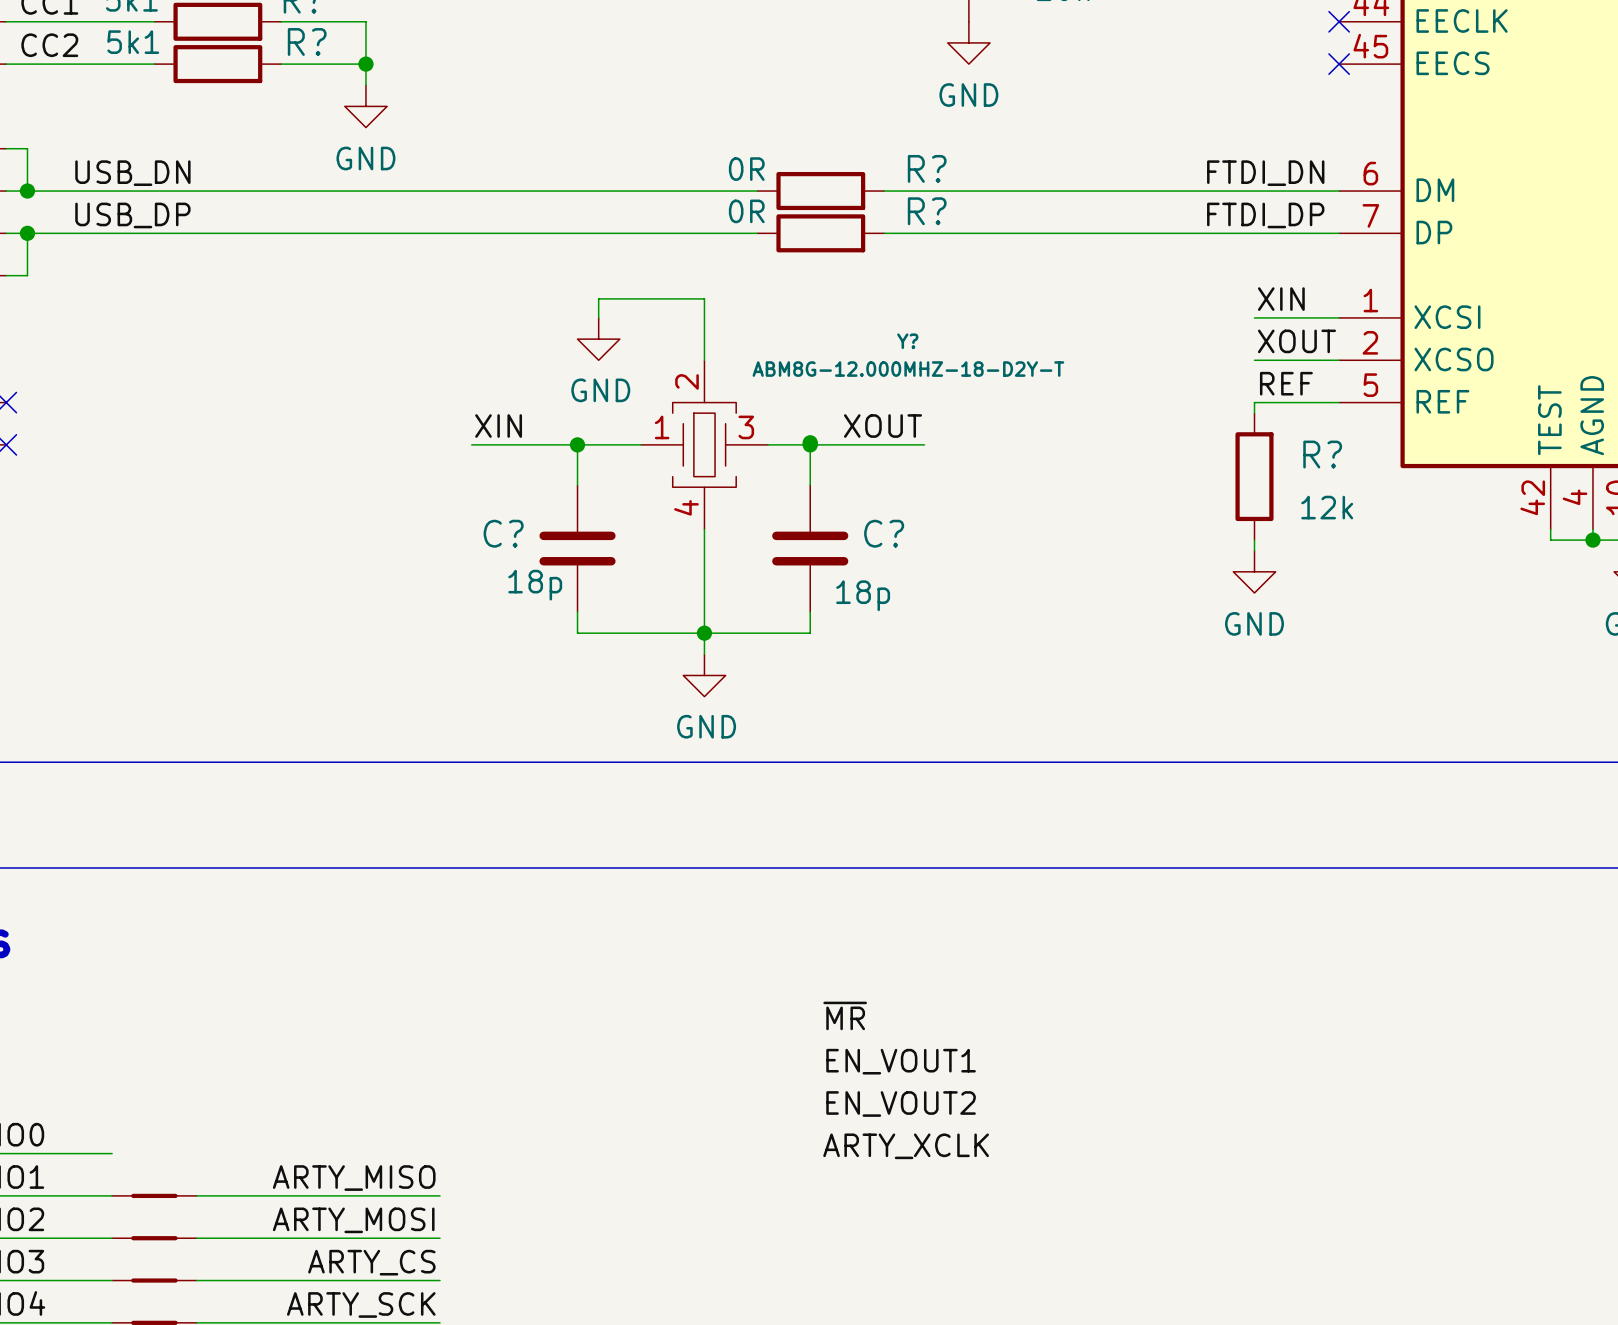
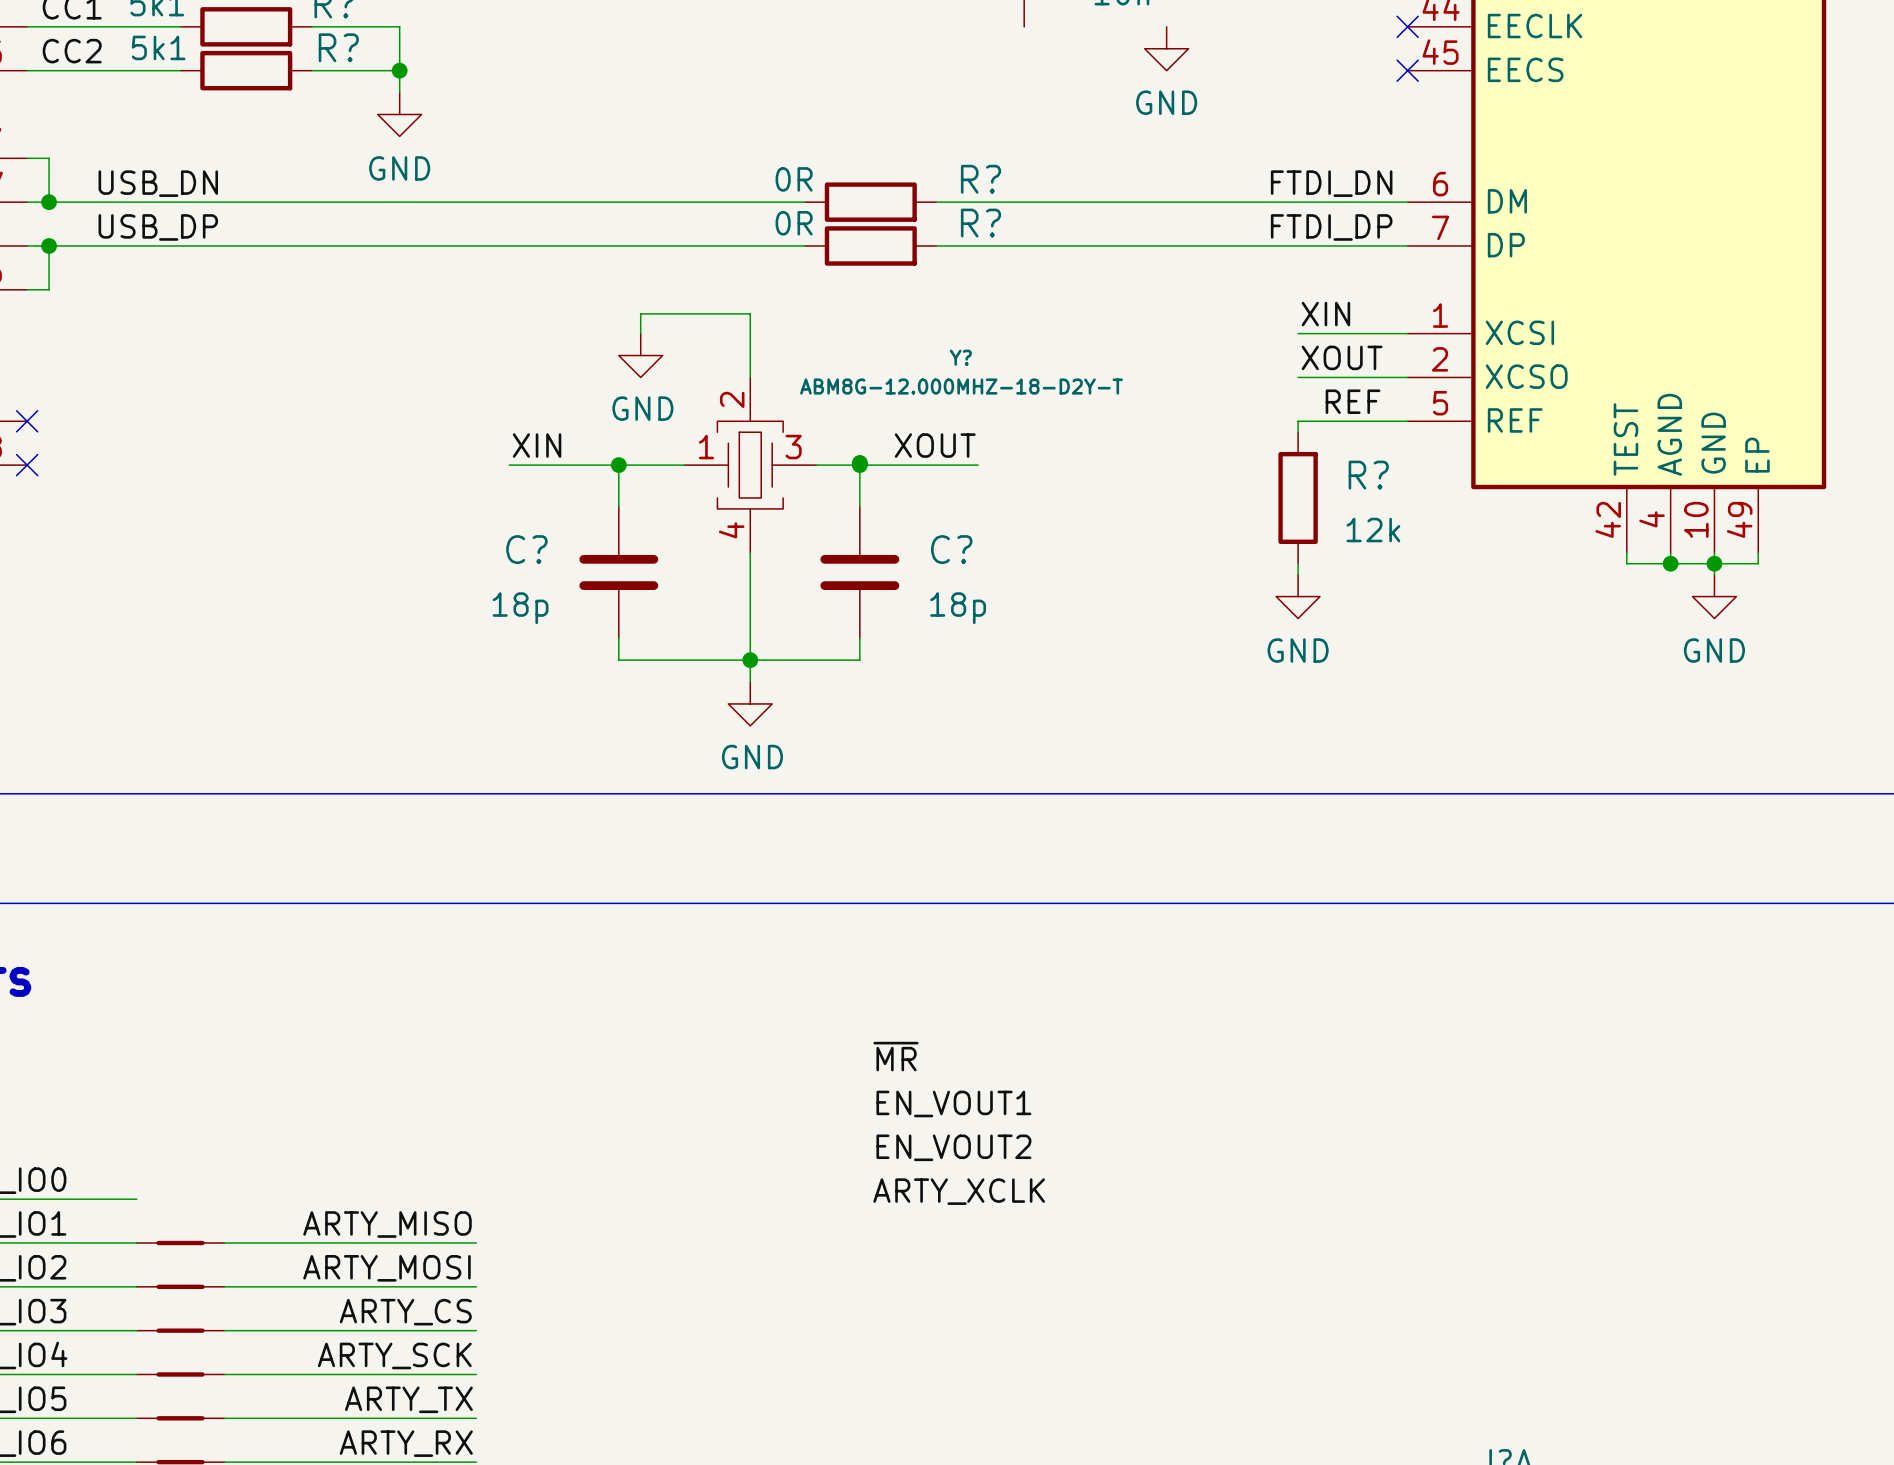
power symbol position: GND (968, 42) -> GND (1166, 48)
label position: XIN (1281, 299) -> XIN (1325, 314)
wire: none -> (1298, 333) (1320, 333)
label position: XOUT (1296, 341) -> XOUT (1342, 357)
wire: none -> (1298, 377) (1320, 377)
wire: (1254, 402) (1254, 413) -> (1320, 421) (1298, 421) (1298, 432)
R? position: (1254, 476) -> (1298, 497)
C? name position: C? (503, 533) -> C? (526, 549)
C? name position: C? (884, 533) -> C? (951, 549)
wire: (1254, 540) (1254, 550) -> (1298, 563) (1298, 574)
power symbol position: GND (1254, 571) -> GND (1298, 596)
C? text position: 18p (535, 585) -> 18p (520, 608)
C? text position: 18p (863, 595) -> 18p (958, 608)

